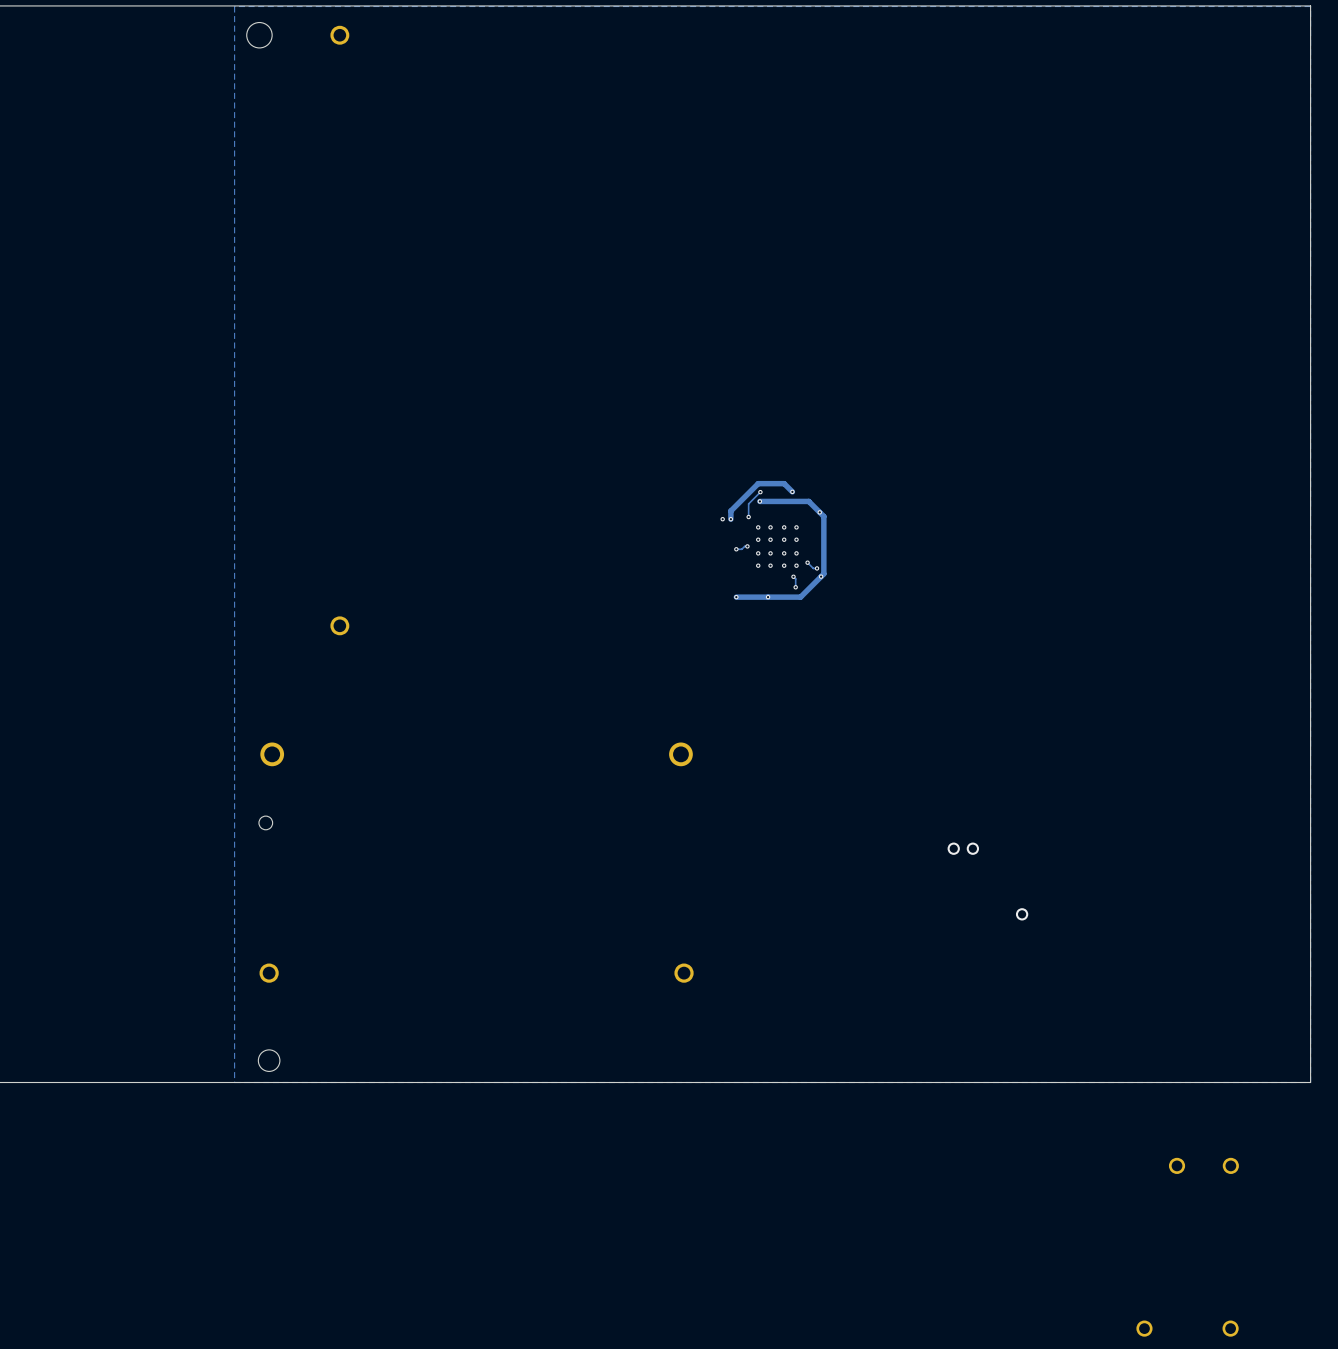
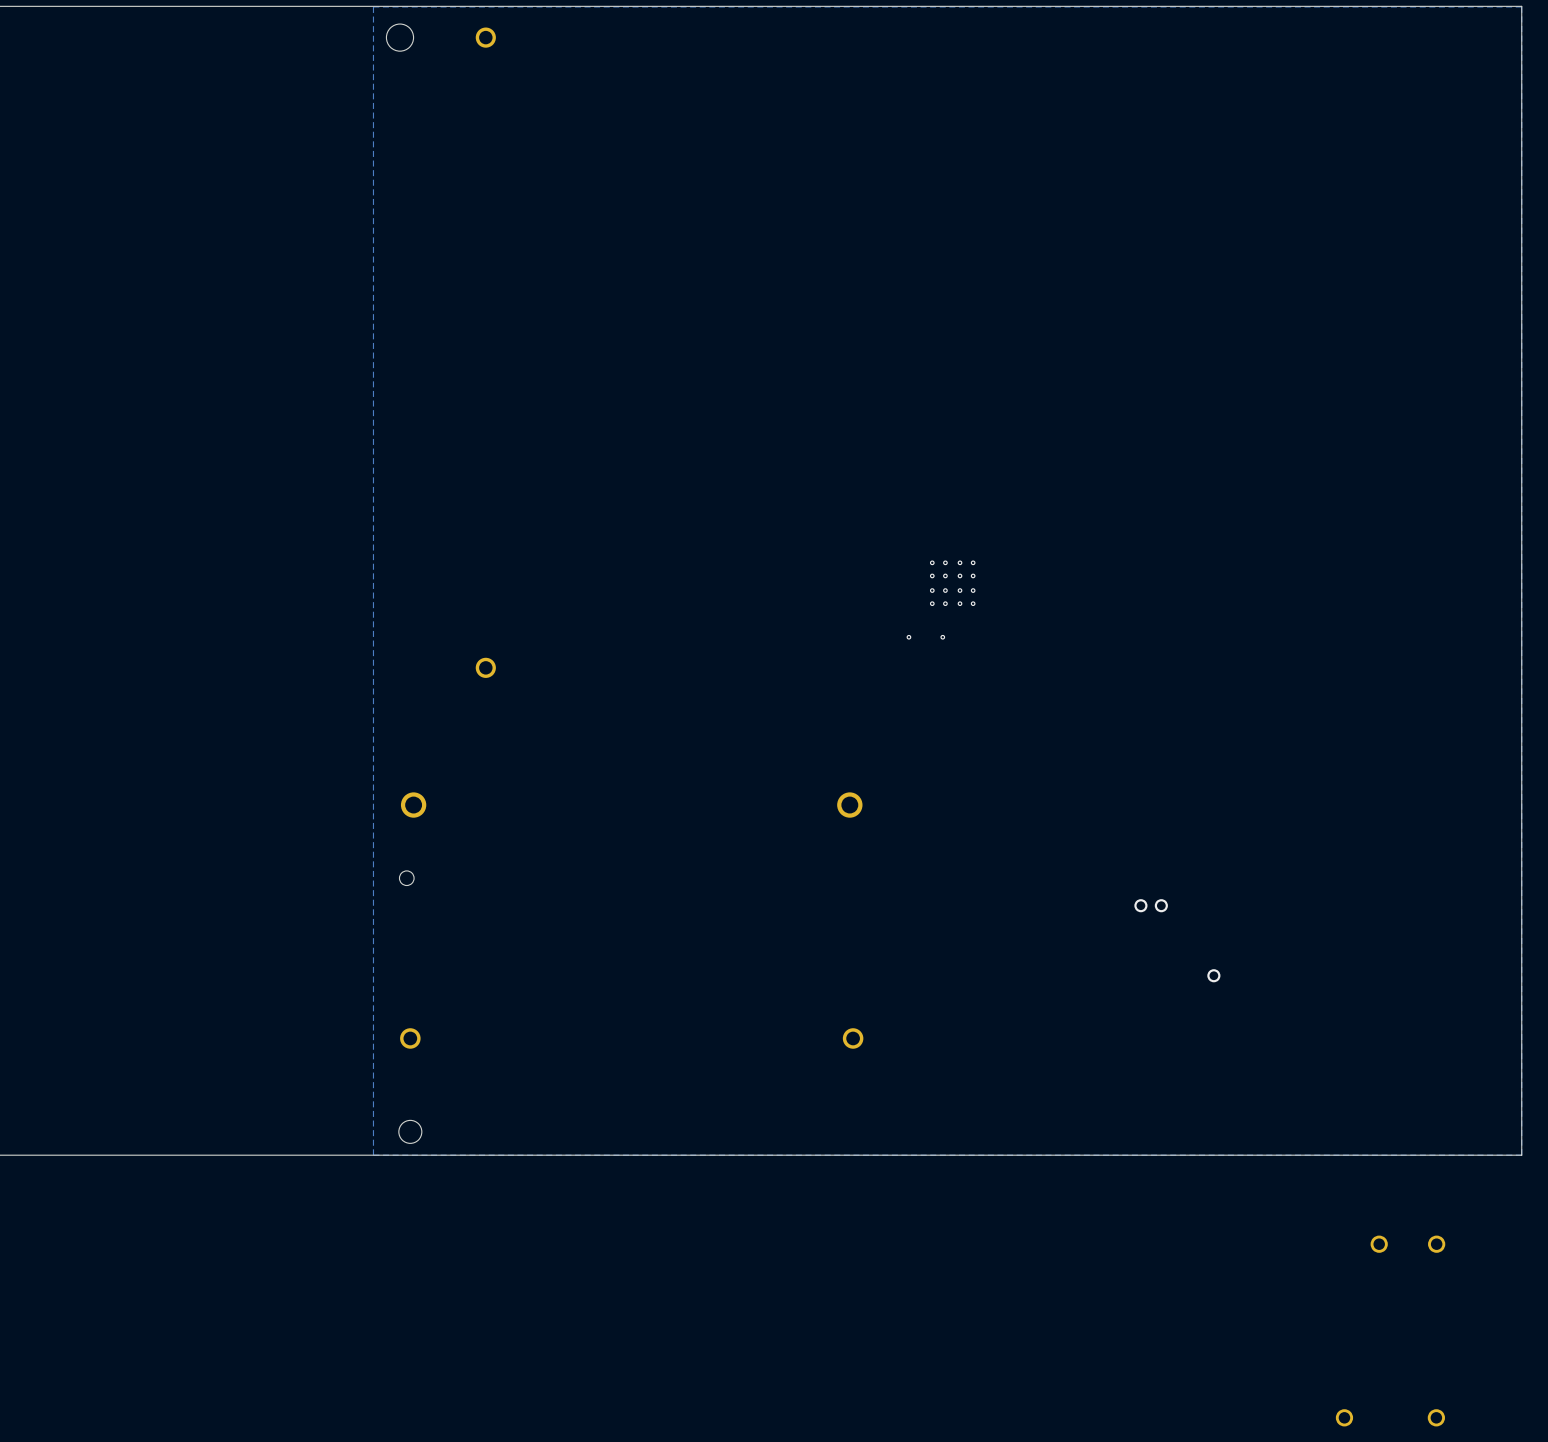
track: (792, 491) (784, 483) (758, 483) (730, 511) (730, 519) -> none
via: (792, 491) -> none
track: (760, 492) (748, 503) (748, 517) -> none
via: (760, 492) -> none
track: (759, 501) (808, 501) (823, 516) (823, 573) (800, 597) (736, 597) -> none
via: (759, 501) -> none
via: (819, 512) -> none
via: (748, 517) -> none
via: (722, 519) -> none
via: (730, 519) -> none
track: (747, 546) (736, 549) -> none
via: (747, 546) -> none
via: (736, 549) -> none
track: (807, 562) (813, 568) (817, 568) -> none
via: (807, 562) -> none
via: (817, 568) -> none
track: (793, 576) (795, 578) (795, 587) -> none
via: (793, 576) -> none
via: (821, 576) -> none
via: (795, 587) -> none

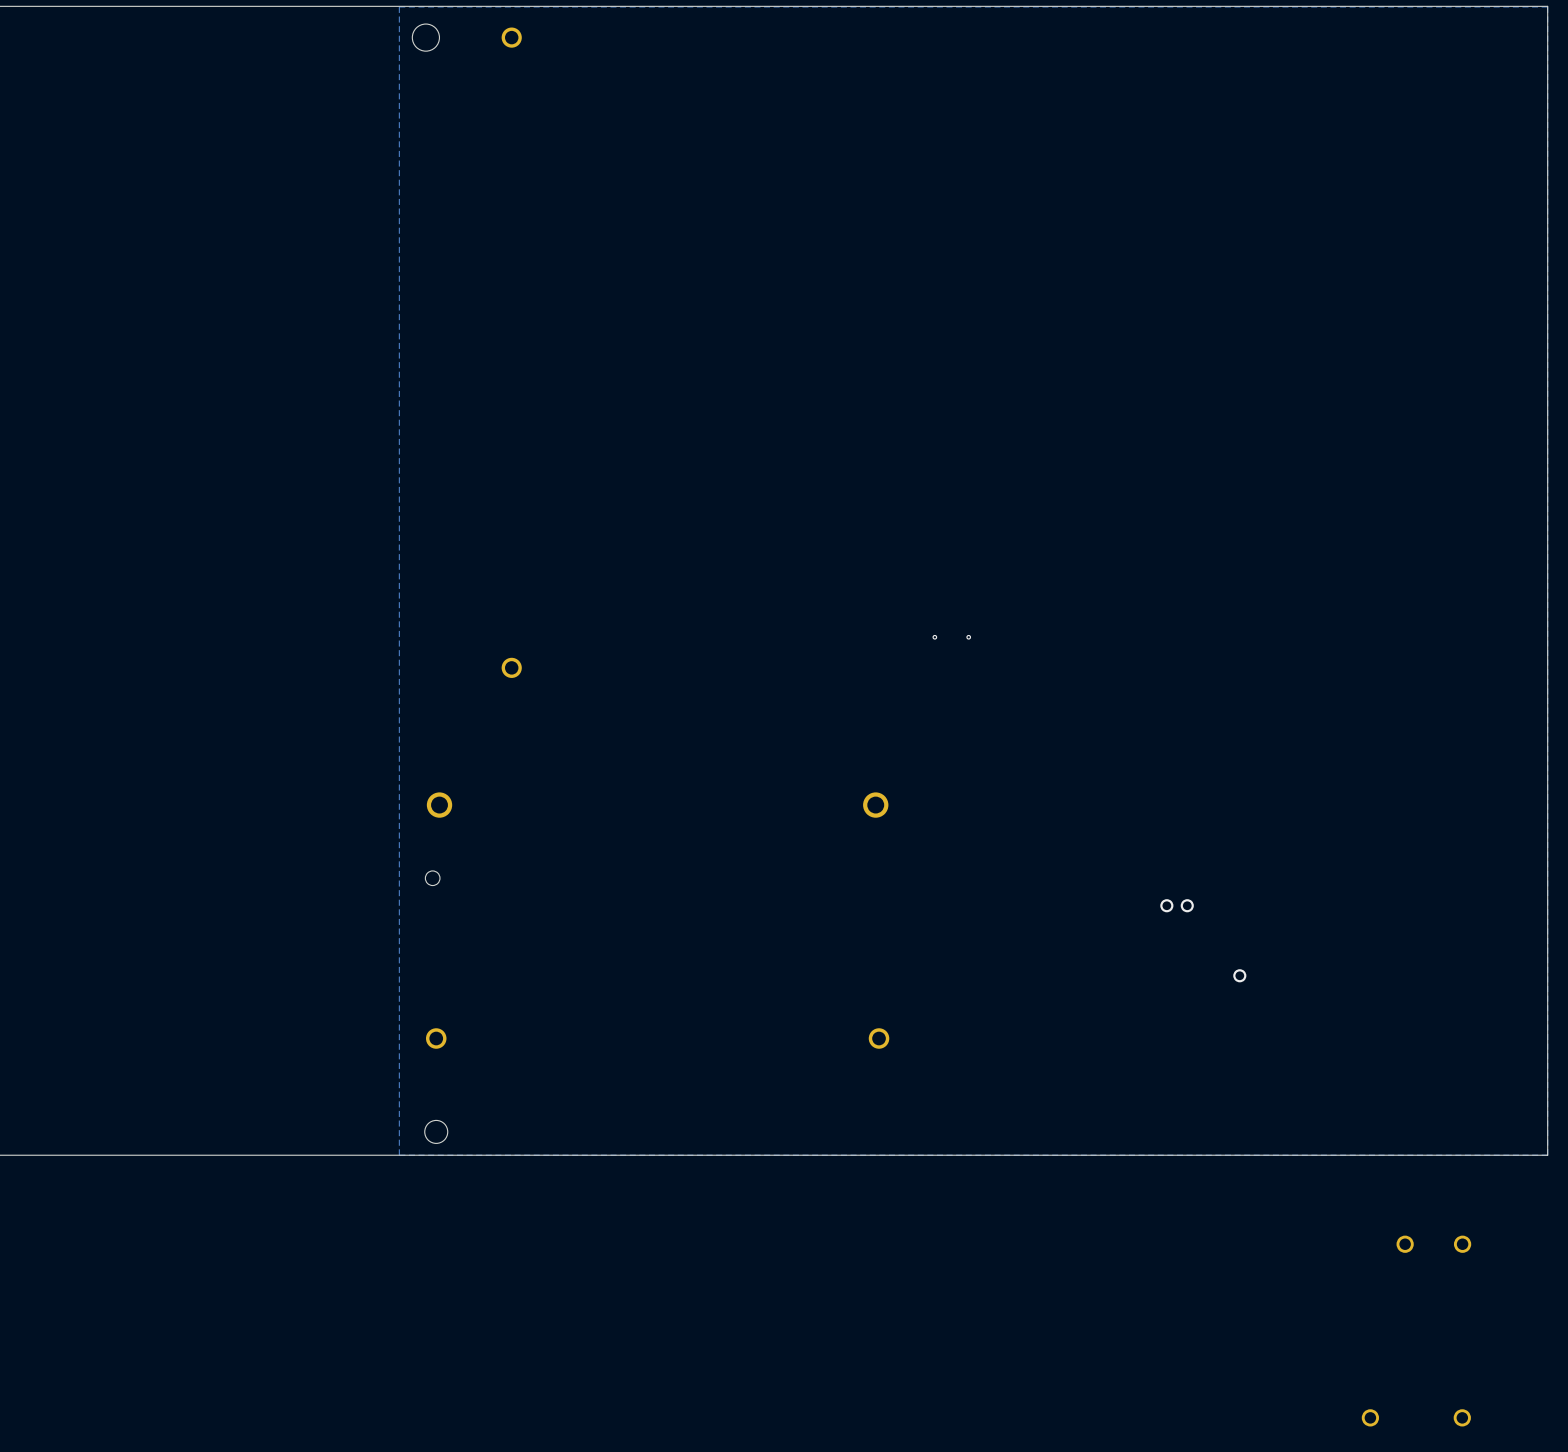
via: (932, 562) -> none
via: (945, 562) -> none
via: (960, 562) -> none
via: (973, 562) -> none
via: (932, 575) -> none
via: (945, 575) -> none
via: (960, 575) -> none
via: (973, 575) -> none
via: (932, 590) -> none
via: (945, 590) -> none
via: (960, 590) -> none
via: (973, 590) -> none
via: (932, 603) -> none
via: (945, 603) -> none
via: (960, 603) -> none
via: (973, 603) -> none

